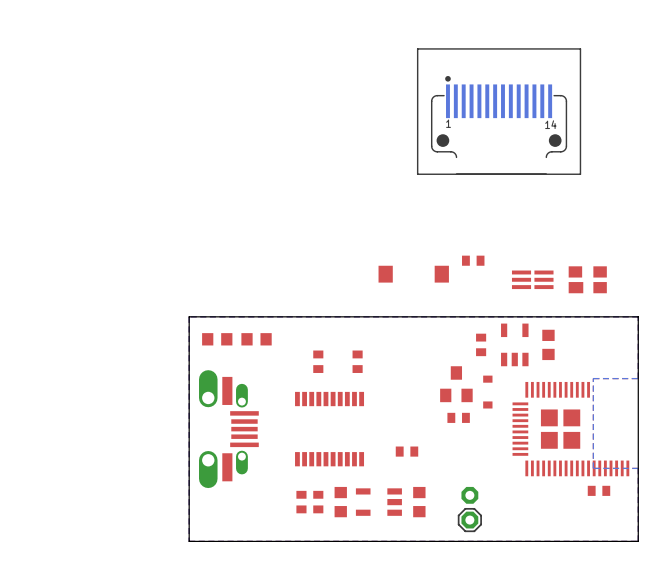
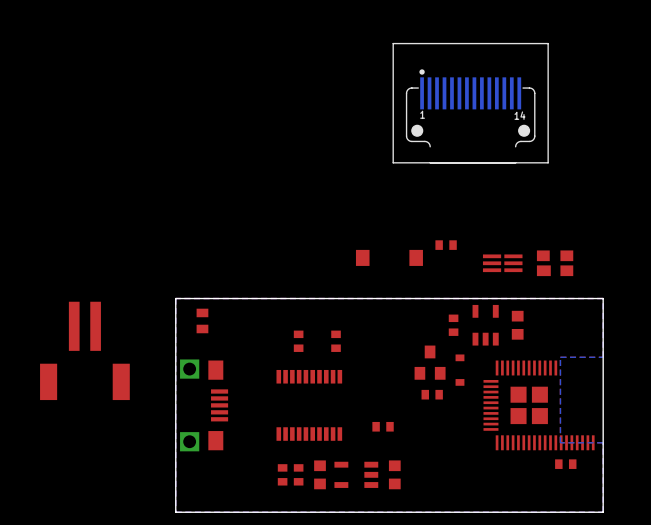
part footprint: [202, 333, 233, 346] -> [196, 308, 209, 334]
part: (256, 339) -> none
part footprint: [199, 370, 259, 489] -> [180, 359, 229, 452]
part: none -> (84, 350)
part: (469, 509) -> none

